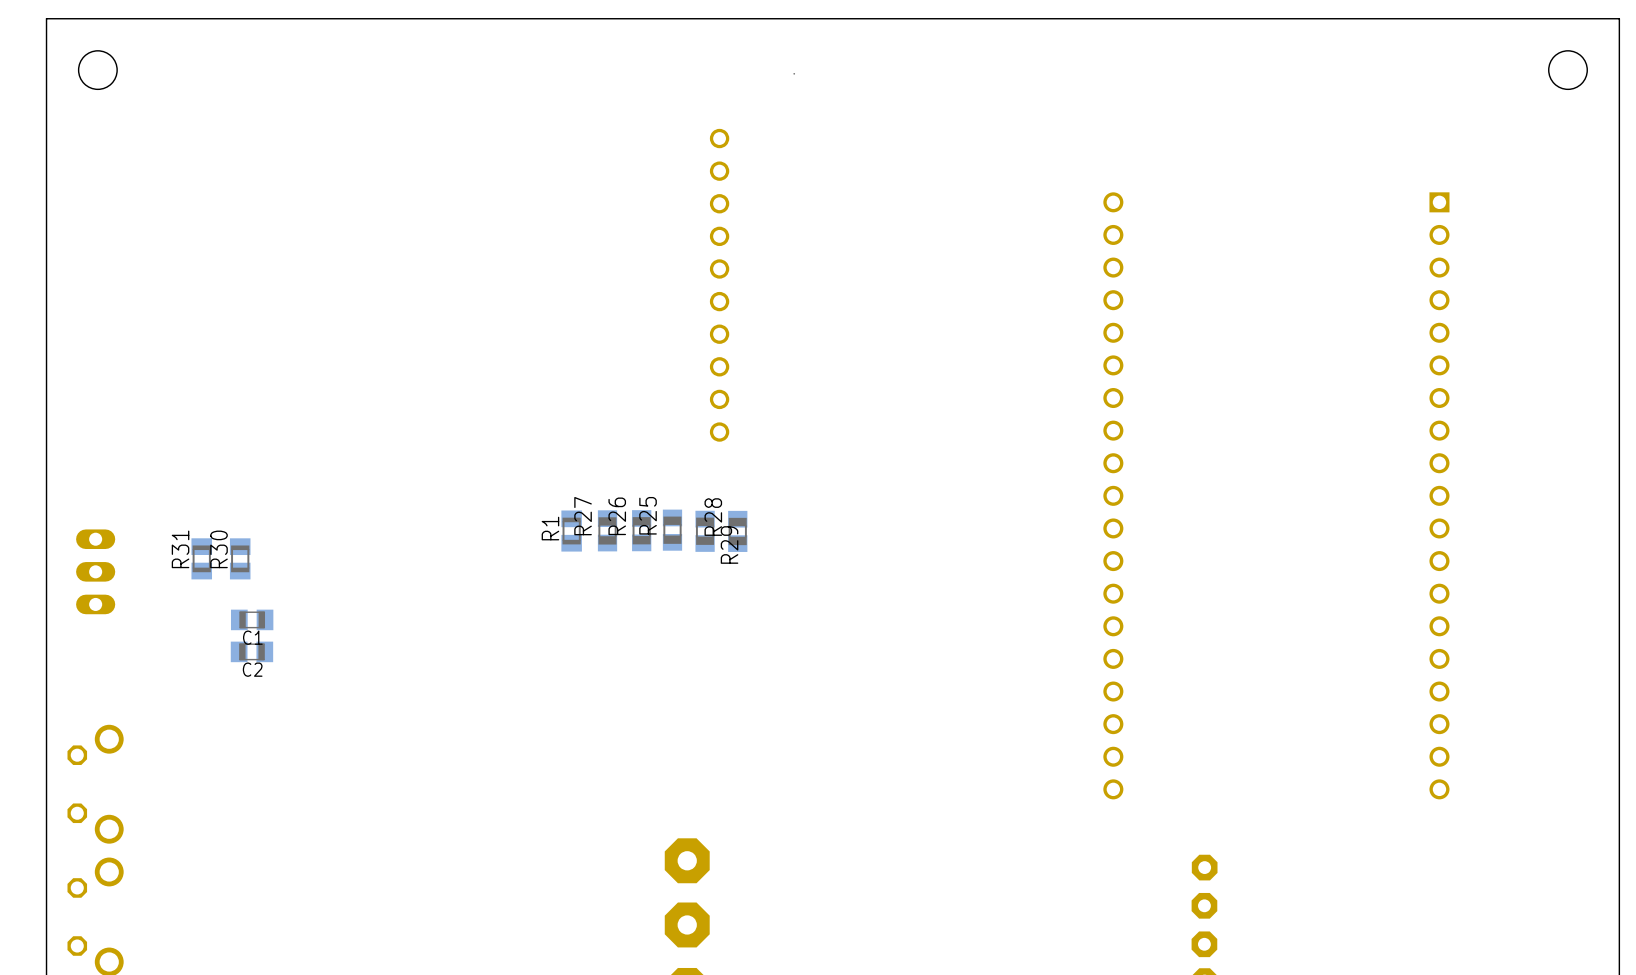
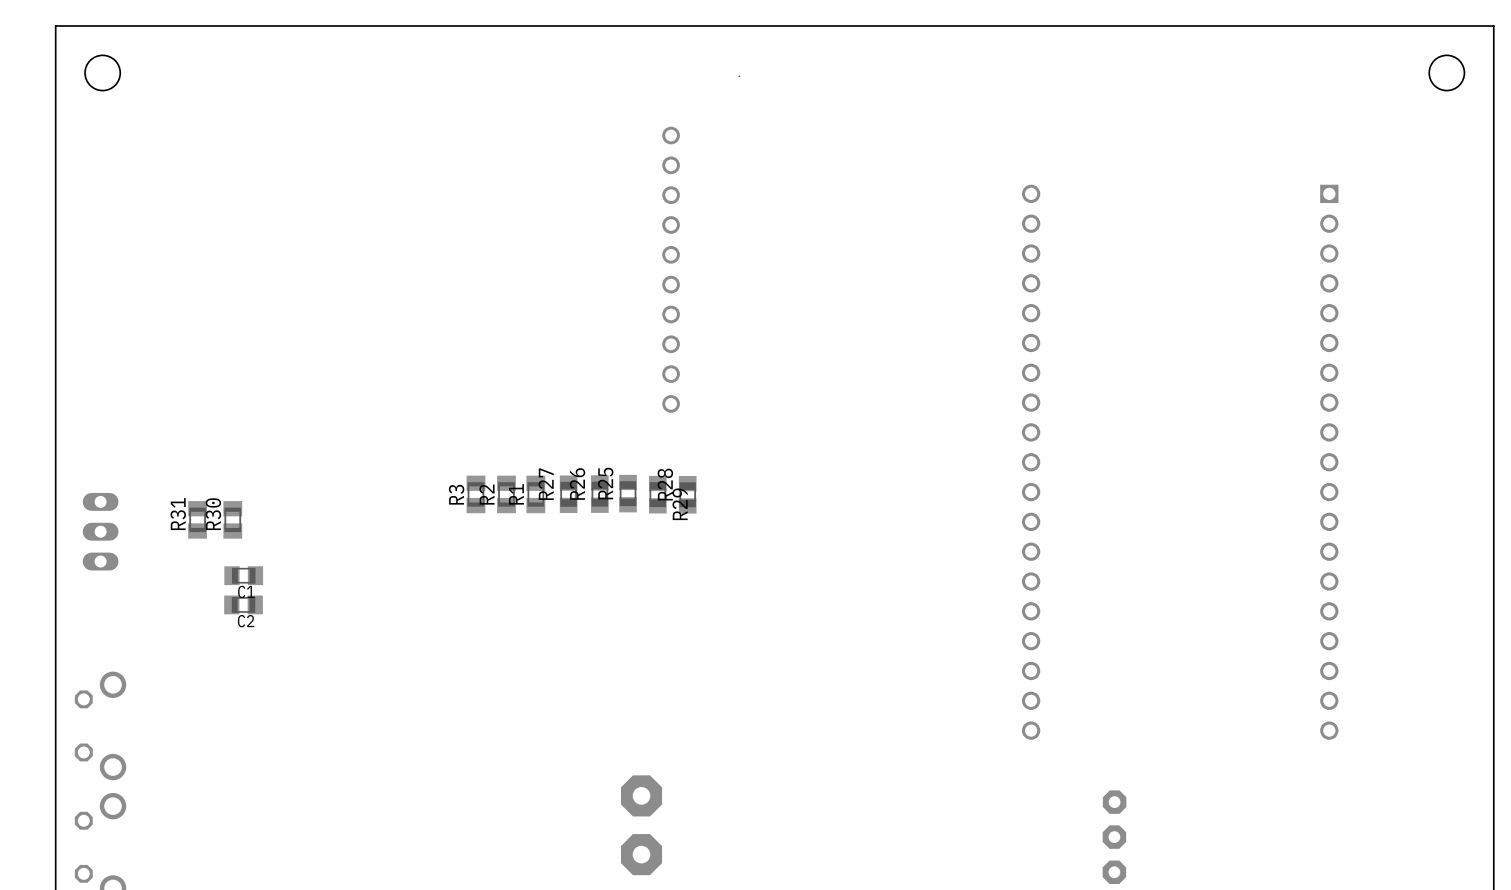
R3: none -> (475, 494)
R2: none -> (506, 494)

